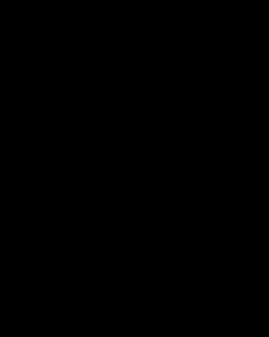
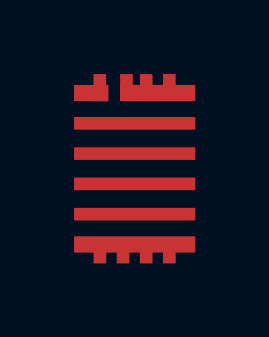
part: none -> (134, 168)

